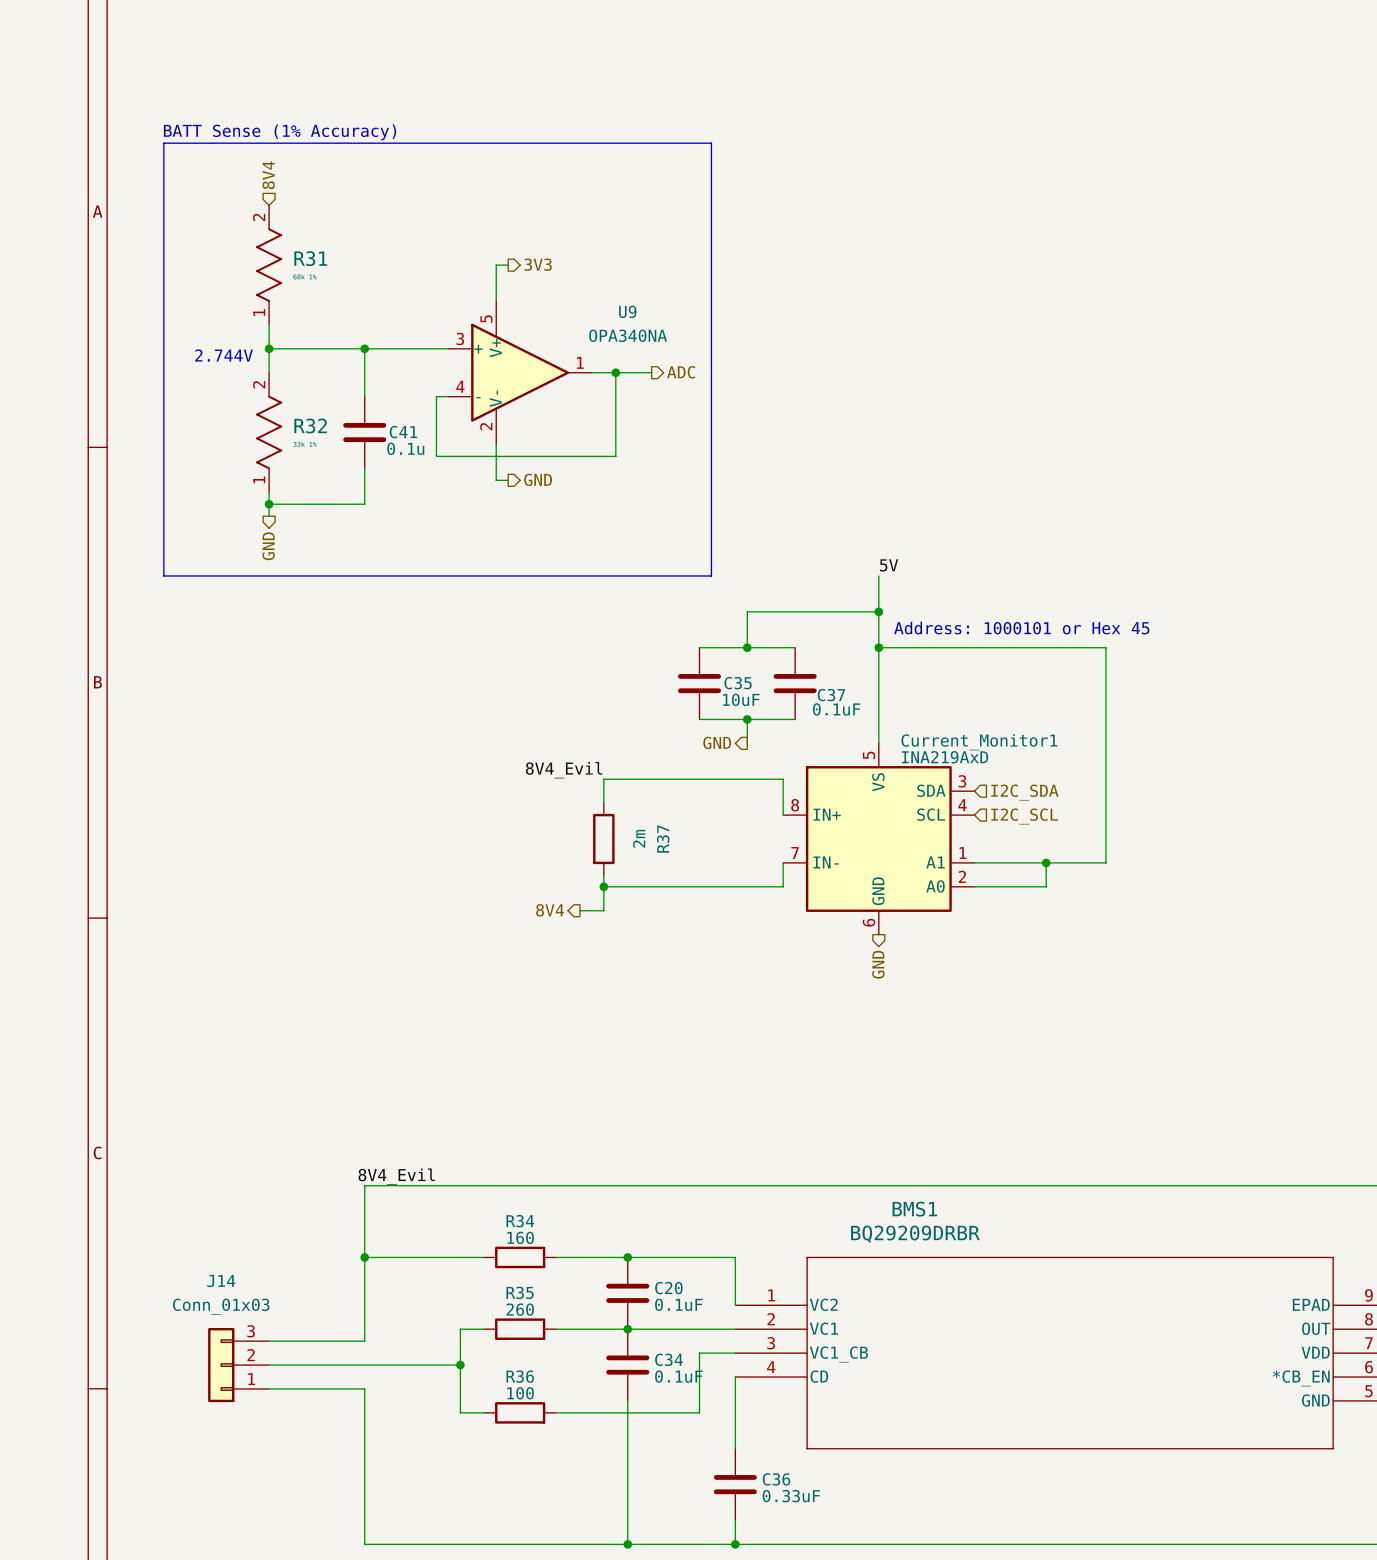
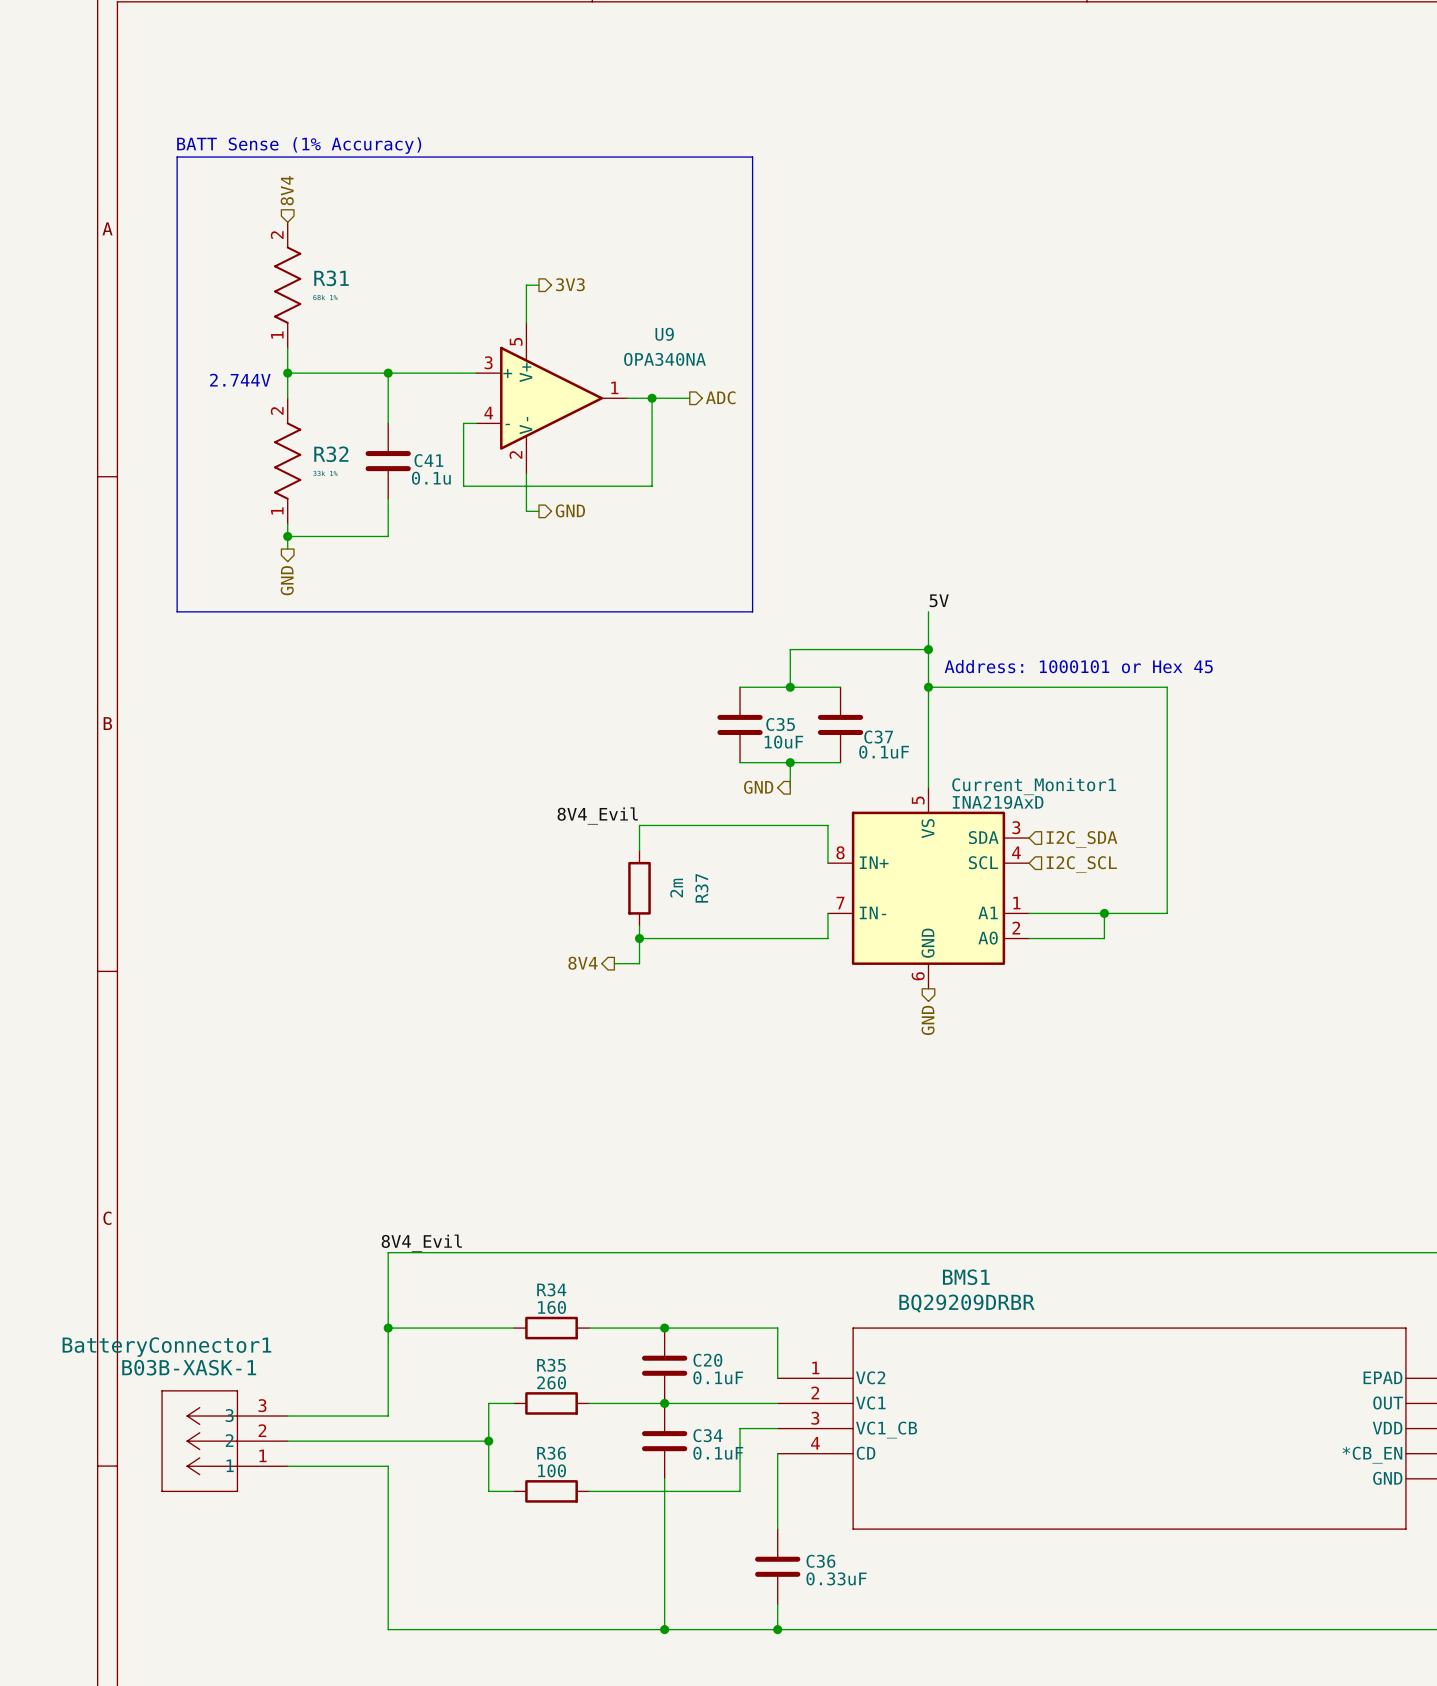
BatteryConnector1: none -> B03B-XASK-1 (224, 1441)
J14: Conn_01x03 (238, 1365) -> none

